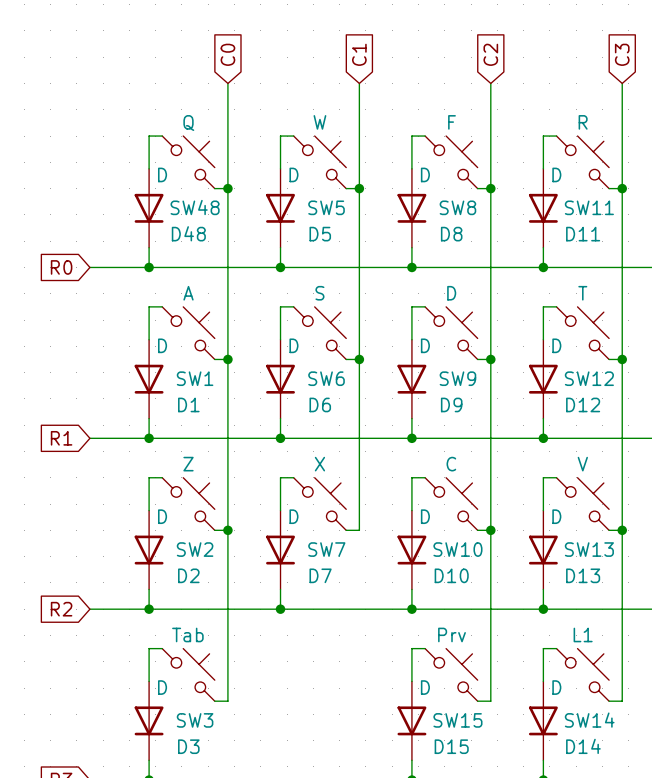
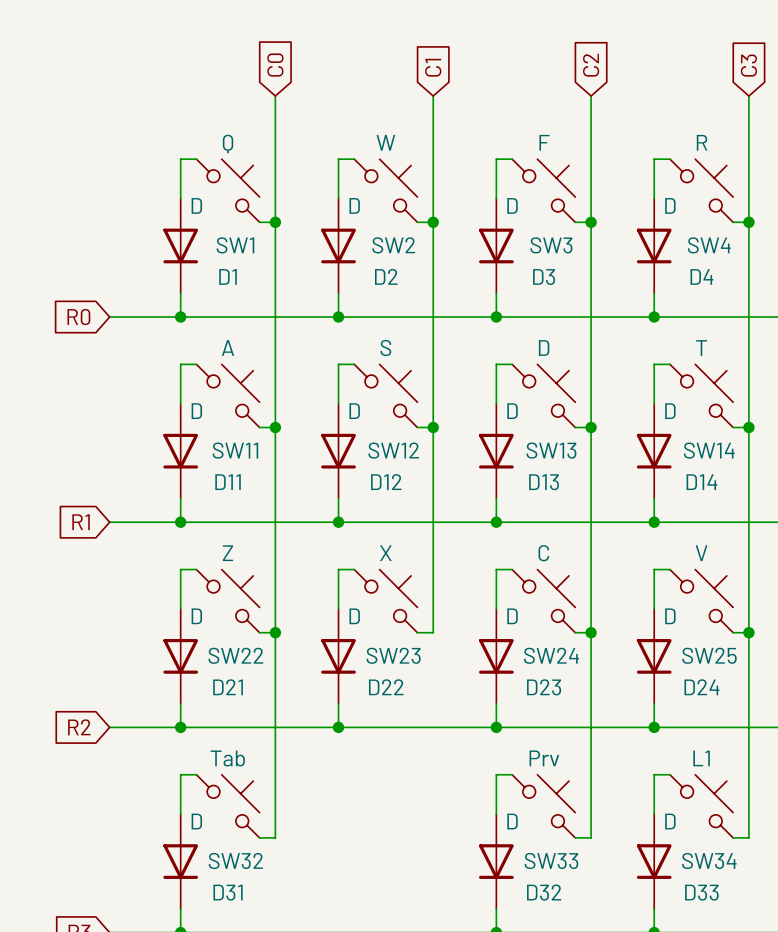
SW48 name: SW48 (195, 207) -> SW1 (235, 245)
SW5 name: SW5 (326, 207) -> SW2 (393, 245)
SW8 name: SW8 (457, 207) -> SW3 (551, 245)
SW11 name: SW11 (589, 207) -> SW4 (709, 245)
D48 name: D48 (188, 233) -> D1 (228, 276)
D5 name: D5 (320, 234) -> D2 (386, 276)
D8 name: D8 (451, 234) -> D3 (544, 277)
D11 name: D11 (583, 234) -> D4 (701, 276)
SW1 name: SW1 (195, 378) -> SW11 (235, 450)
SW6 name: SW6 (326, 378) -> SW12 (393, 450)
SW9 name: SW9 (457, 378) -> SW13 (551, 450)
SW12 name: SW12 (589, 378) -> SW14 (709, 450)
D1 name: D1 (188, 404) -> D11 (228, 482)
D6 name: D6 (320, 404) -> D12 (386, 482)
D9 name: D9 (451, 404) -> D13 (544, 482)
D12 name: D12 (583, 404) -> D14 (701, 482)
SW2 name: SW2 (195, 549) -> SW22 (235, 655)
SW7 name: SW7 (326, 549) -> SW23 (393, 655)
SW10 name: SW10 (457, 549) -> SW24 (551, 655)
SW13 name: SW13 (589, 549) -> SW25 (709, 655)
D2 name: D2 (188, 575) -> D21 (228, 687)
D7 name: D7 (320, 575) -> D22 (386, 687)
D10 name: D10 (451, 575) -> D23 (544, 687)
D13 name: D13 (583, 575) -> D24 (701, 687)
SW3 name: SW3 (195, 720) -> SW32 (235, 860)
SW15 name: SW15 (457, 720) -> SW33 (551, 860)
SW14 name: SW14 (589, 720) -> SW34 (709, 860)
D3 name: D3 (188, 746) -> D31 (228, 892)
D15 name: D15 (451, 746) -> D32 (544, 892)
D14 name: D14 (583, 746) -> D33 (701, 892)

